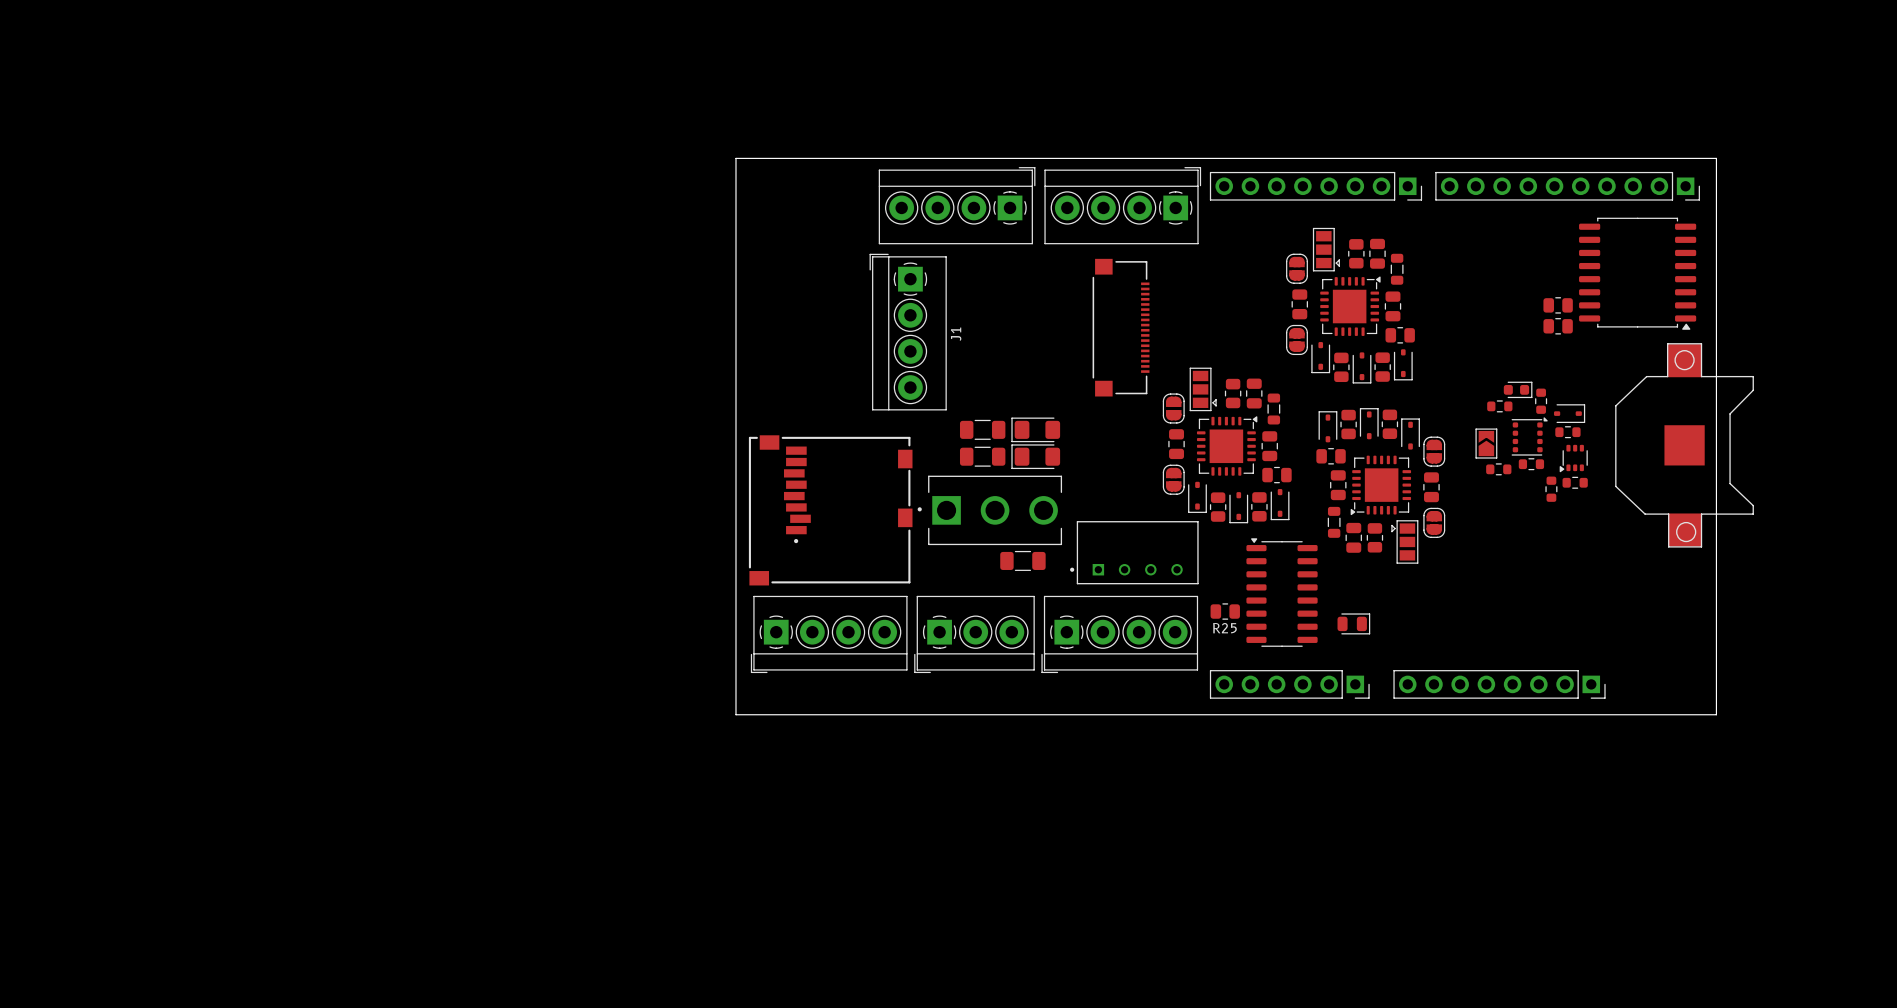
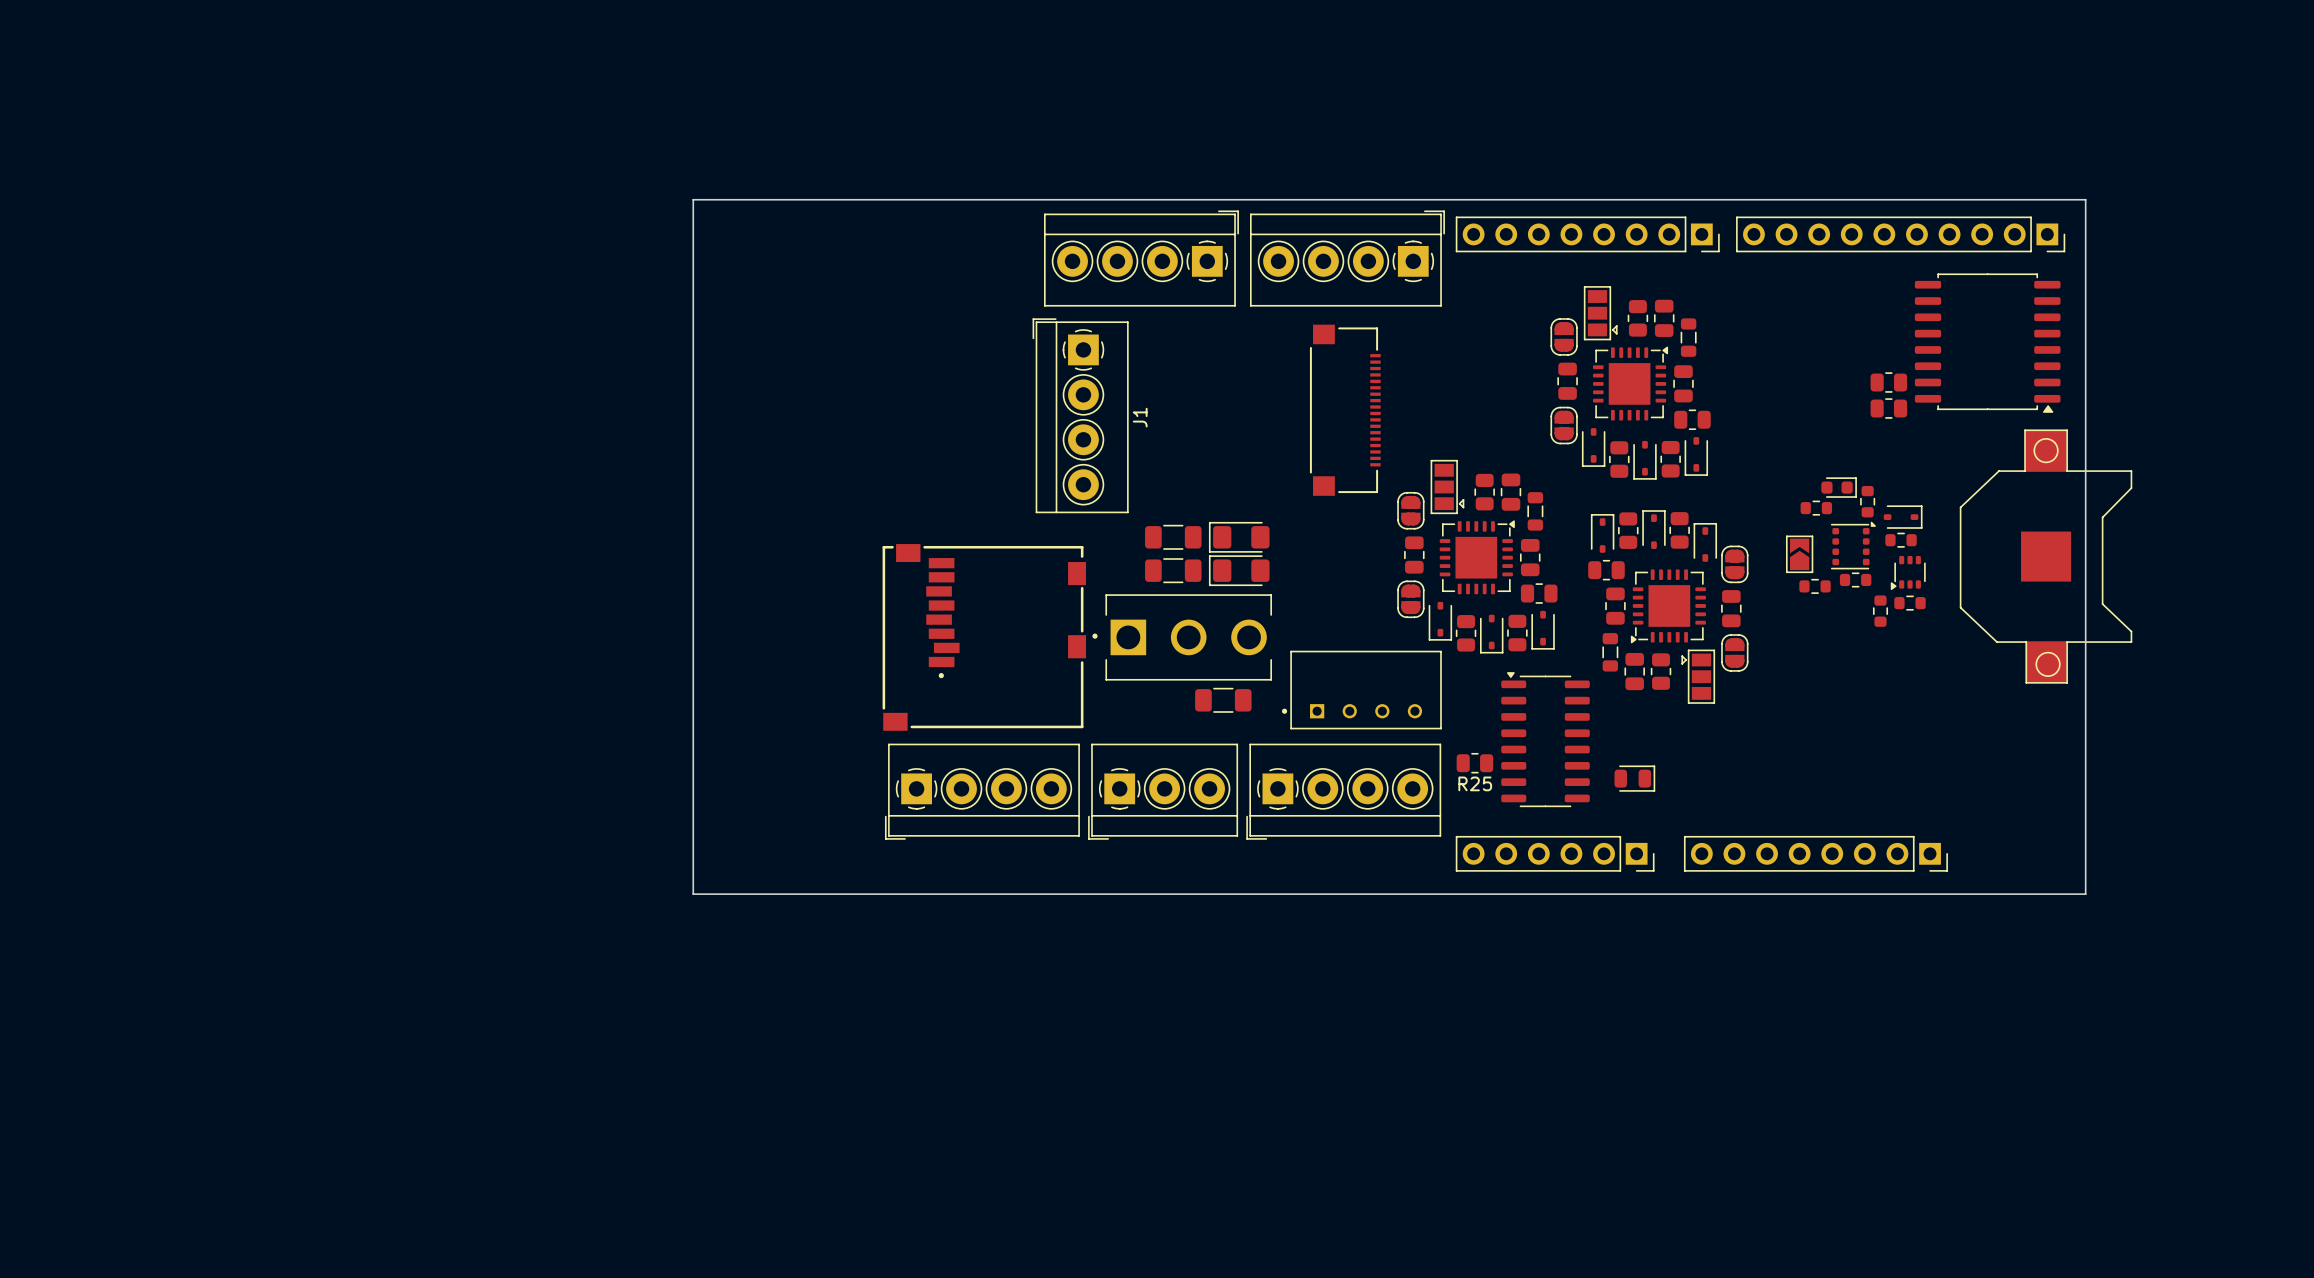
board edge: (735, 158) (735, 714) (1716, 714) -> (866, 199) (693, 199) (693, 894) (2085, 894) (2085, 891)

